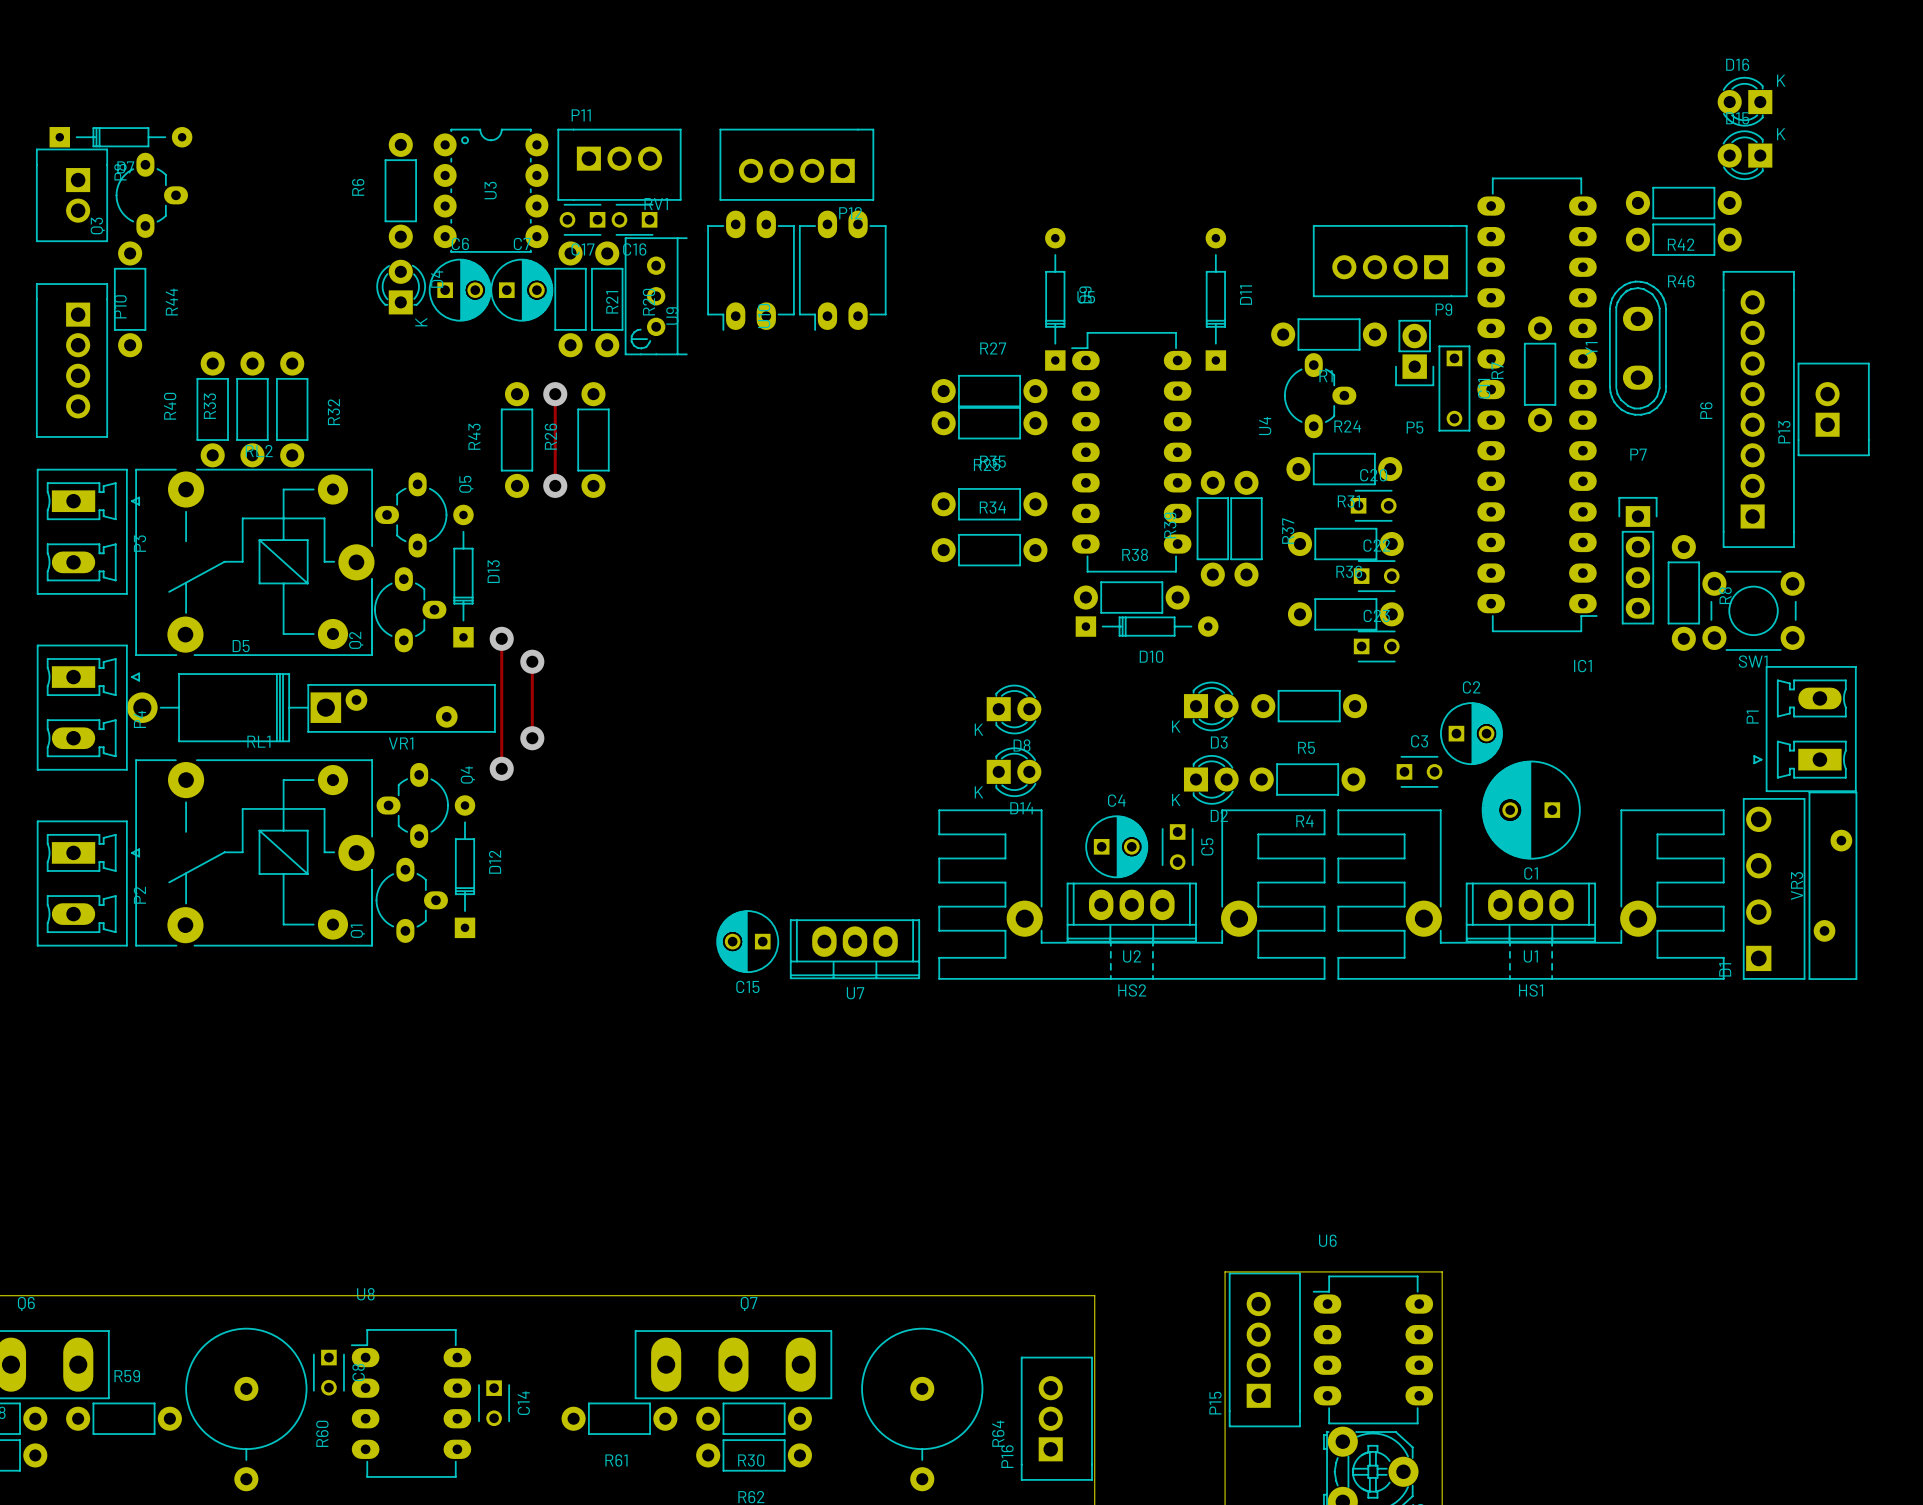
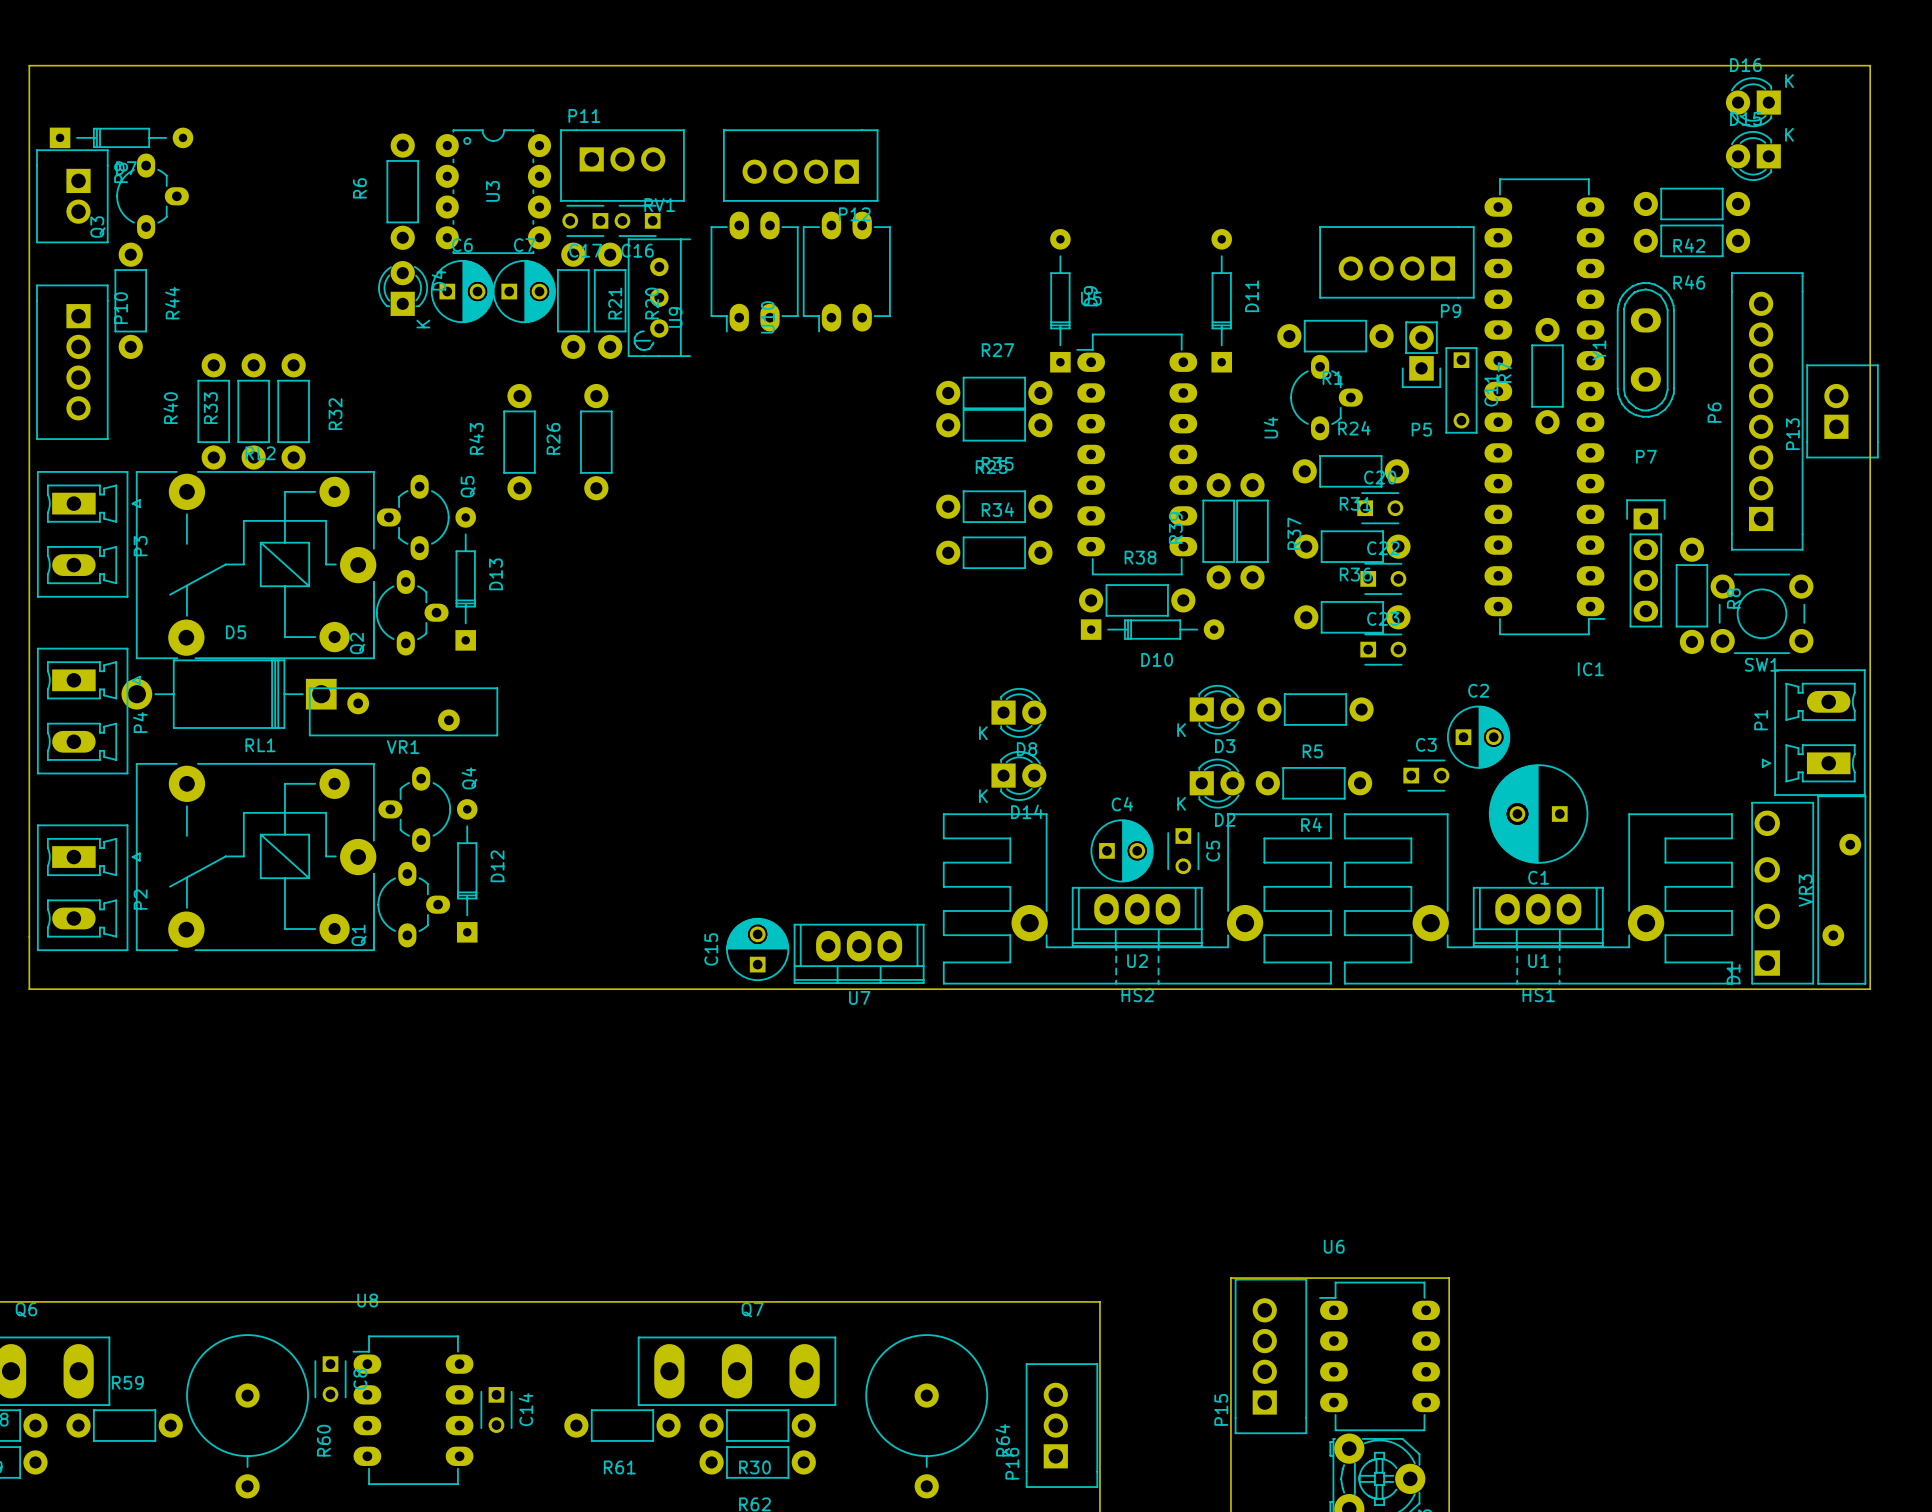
board edge: none -> (29, 65) (29, 989) (1870, 989) (1870, 65) (29, 65)
track: (555, 394) (555, 485) -> none
via: (555, 394) -> none
via: (555, 485) -> none
track: (501, 638) (501, 768) -> none
via: (501, 638) -> none
track: (532, 661) (532, 738) -> none
via: (532, 661) -> none
D5 position: (234, 707) -> (229, 694)
via: (532, 738) -> none
via: (501, 768) -> none
C15 rotation: 0° (747, 941) -> 90° clockwise (757, 949)

